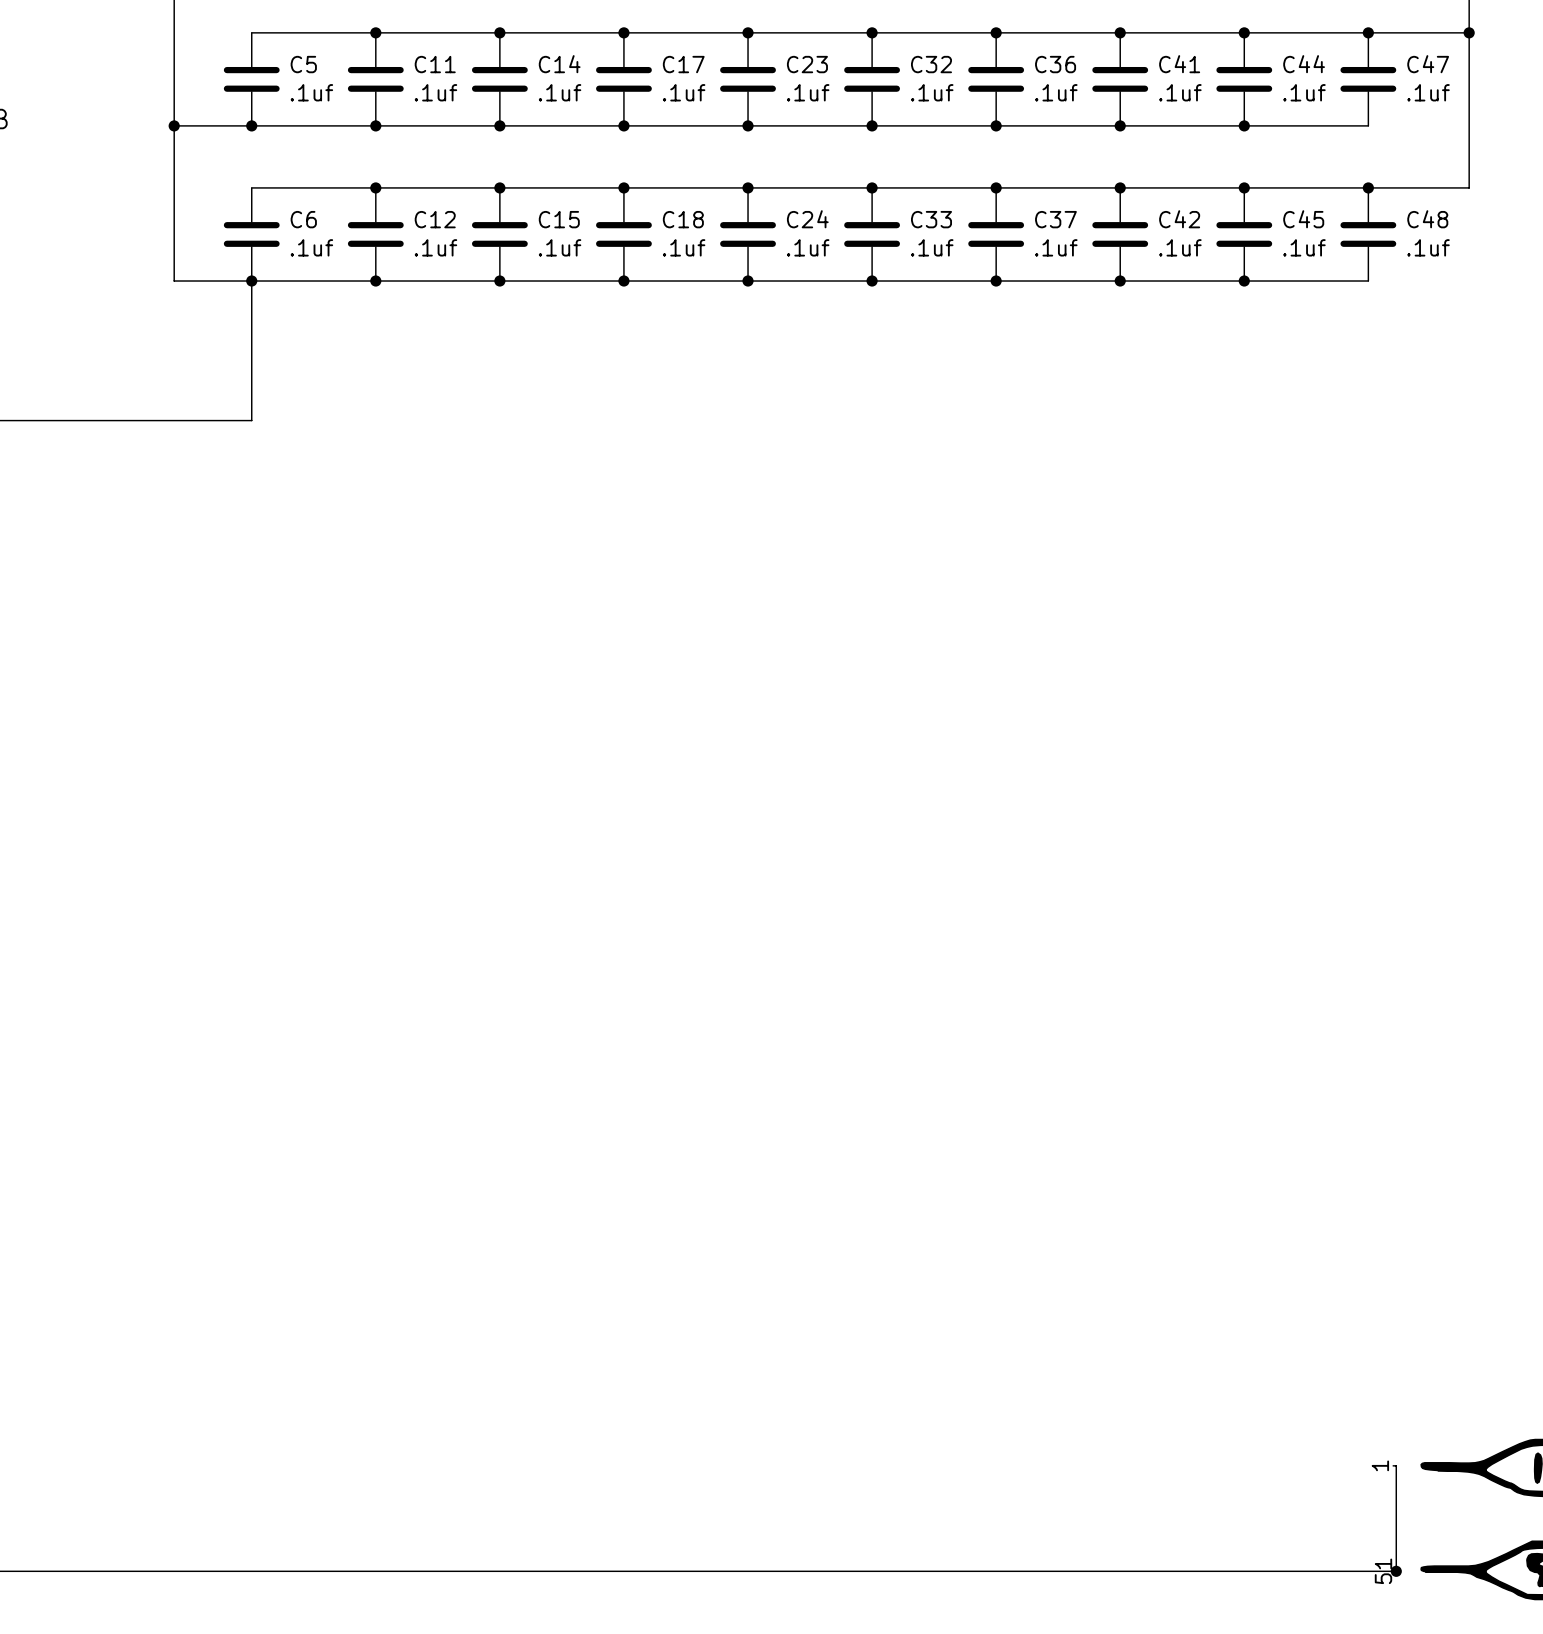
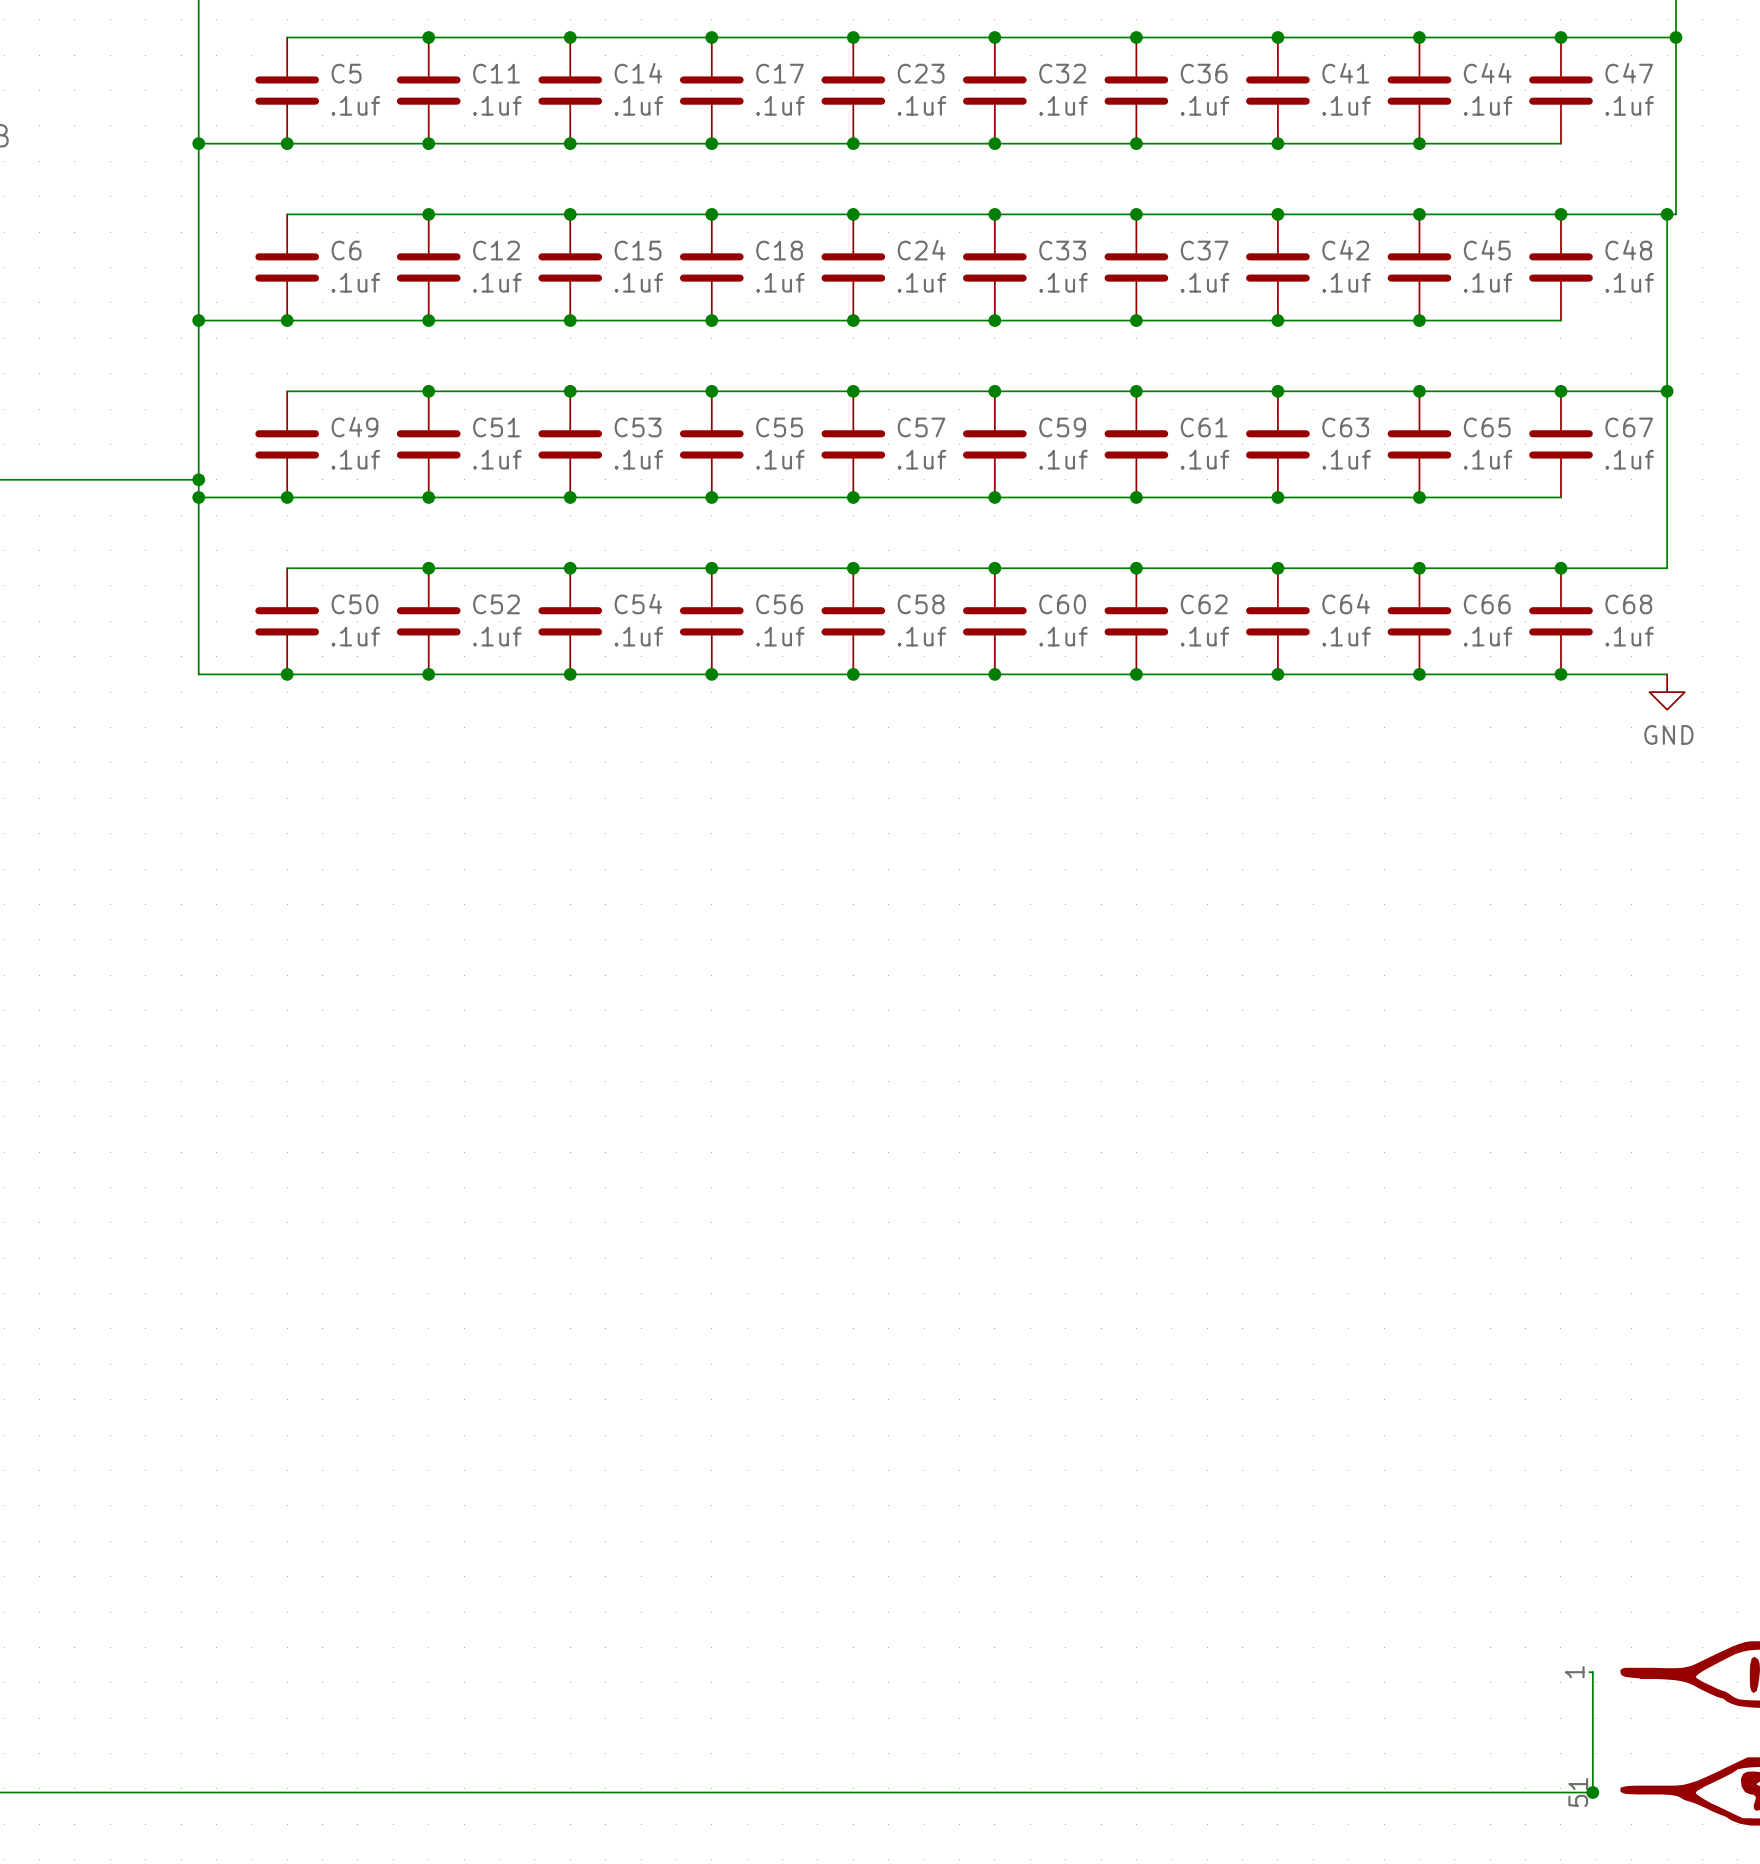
wire: none -> (1667, 214) (1667, 568) (287, 568)
junction: none -> (1667, 214)
wire: none -> (198, 320) (198, 674) (1667, 674)
junction: none -> (198, 320)
wire: (251, 281) (251, 420) (174, 420) -> none
wire: none -> (287, 391) (1667, 391)
junction: none -> (428, 391)
junction: none -> (570, 391)
junction: none -> (711, 391)
junction: none -> (853, 391)
junction: none -> (994, 391)
junction: none -> (1136, 391)
junction: none -> (1277, 391)
junction: none -> (1419, 391)
junction: none -> (1560, 391)
junction: none -> (1667, 391)
C49: none -> .1uf (287, 444)
C51: none -> .1uf (428, 444)
C53: none -> .1uf (570, 444)
C55: none -> .1uf (711, 444)
C57: none -> .1uf (853, 444)
C59: none -> .1uf (994, 444)
C61: none -> .1uf (1136, 444)
C63: none -> .1uf (1277, 444)
C65: none -> .1uf (1419, 444)
C67: none -> .1uf (1560, 444)
junction: none -> (198, 479)
wire: none -> (198, 497) (1560, 497)
junction: none -> (198, 497)
junction: none -> (287, 497)
junction: none -> (428, 497)
junction: none -> (570, 497)
junction: none -> (711, 497)
junction: none -> (853, 497)
junction: none -> (994, 497)
junction: none -> (1136, 497)
junction: none -> (1277, 497)
junction: none -> (1419, 497)
junction: none -> (428, 568)
junction: none -> (570, 568)
junction: none -> (711, 568)
junction: none -> (853, 568)
junction: none -> (994, 568)
junction: none -> (1136, 568)
junction: none -> (1277, 568)
junction: none -> (1419, 568)
junction: none -> (1560, 568)
C50: none -> .1uf (287, 621)
C52: none -> .1uf (428, 621)
C54: none -> .1uf (570, 621)
C56: none -> .1uf (711, 621)
C58: none -> .1uf (853, 621)
C60: none -> .1uf (994, 621)
C62: none -> .1uf (1136, 621)
C64: none -> .1uf (1277, 621)
C66: none -> .1uf (1419, 621)
C68: none -> .1uf (1560, 621)
junction: none -> (287, 674)
junction: none -> (428, 674)
junction: none -> (570, 674)
junction: none -> (711, 674)
junction: none -> (853, 674)
junction: none -> (994, 674)
junction: none -> (1136, 674)
junction: none -> (1277, 674)
junction: none -> (1419, 674)
junction: none -> (1560, 674)
power symbol: none -> GND (1667, 692)

